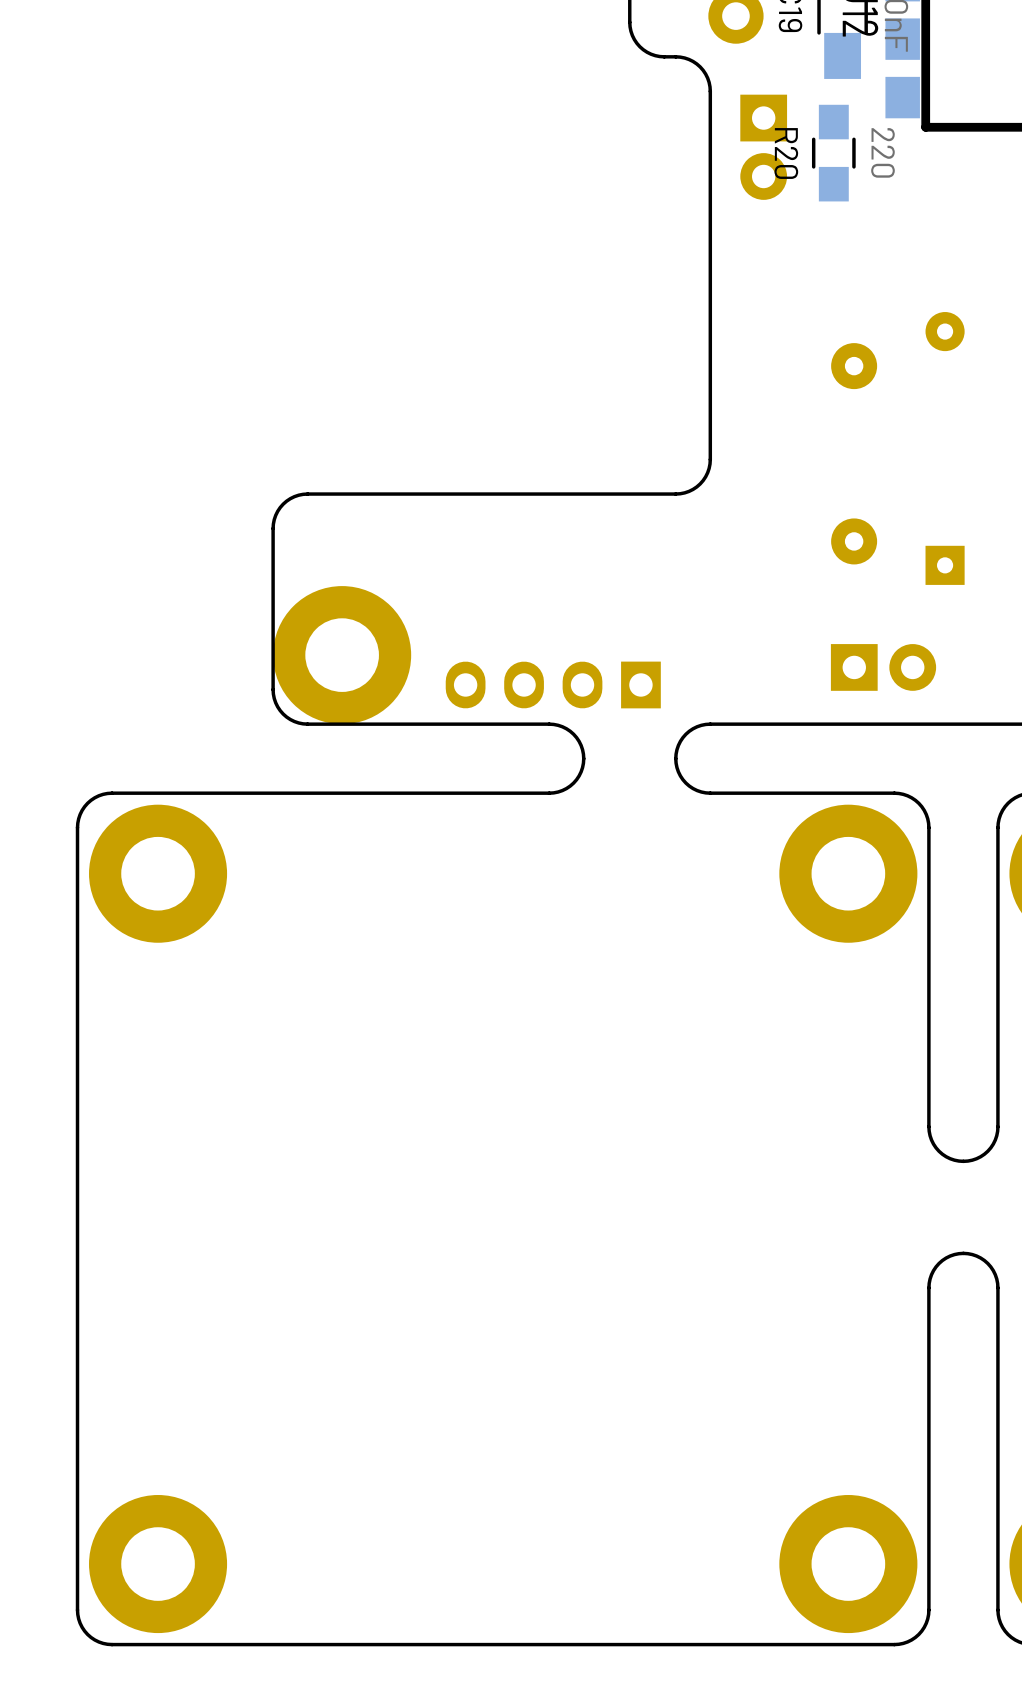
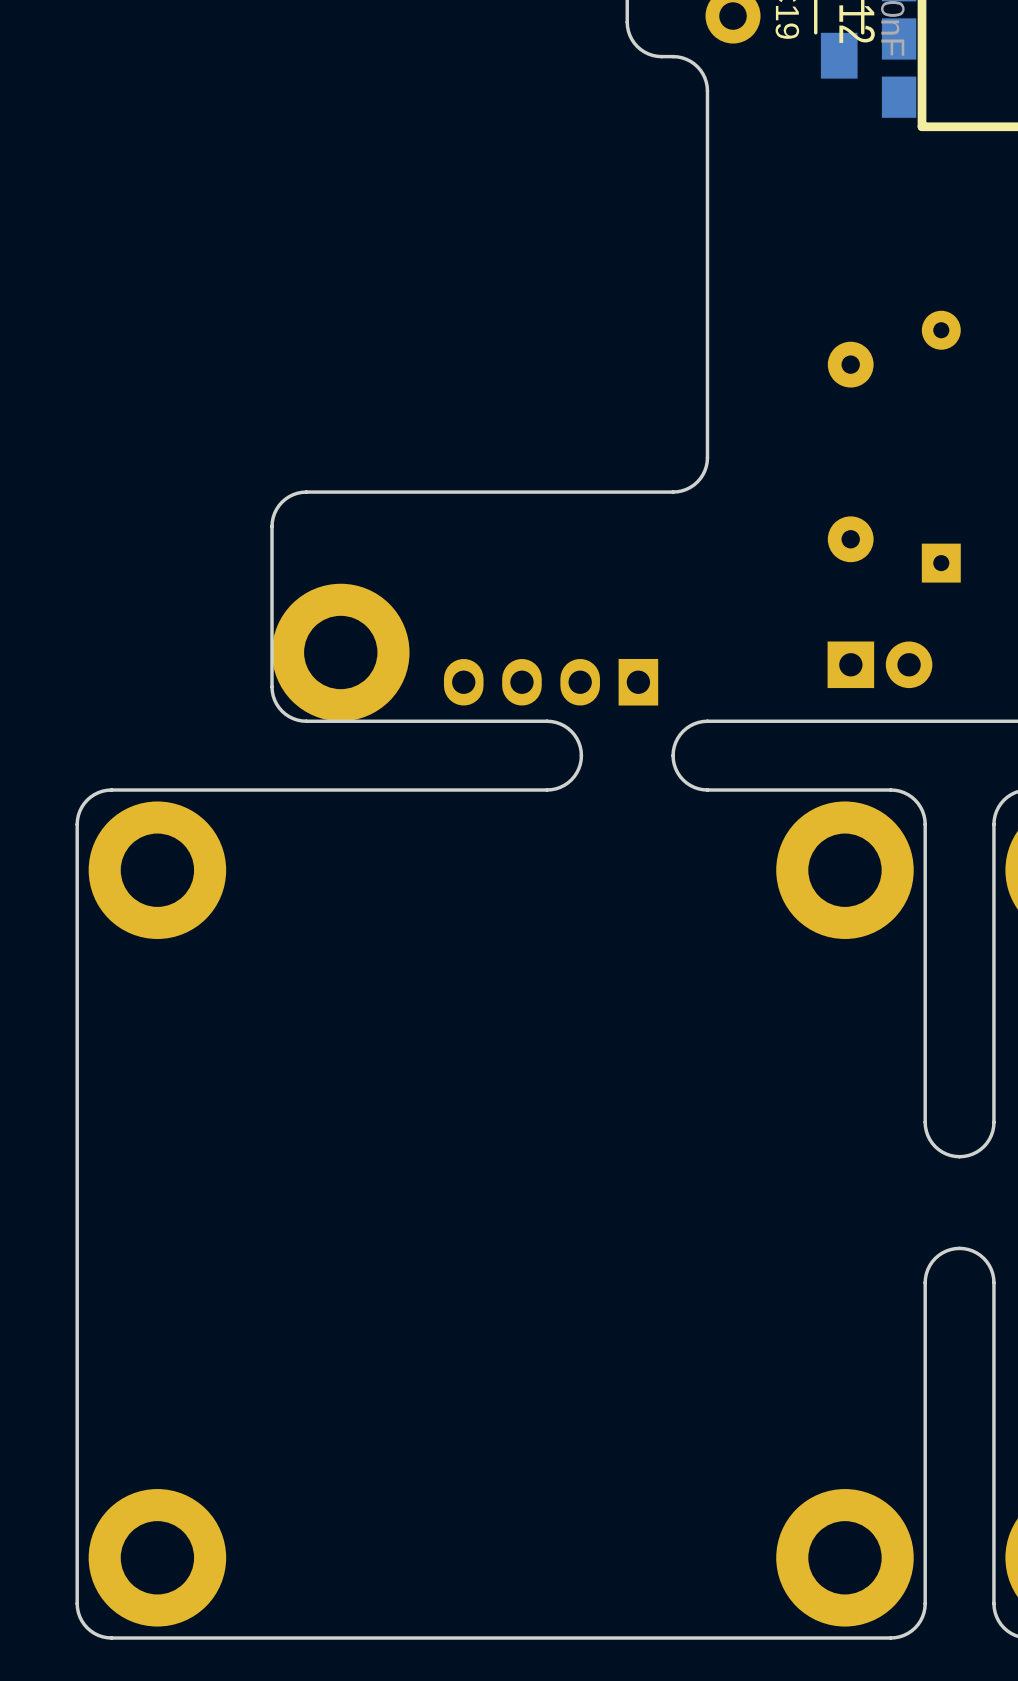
part: (763, 147) -> none
R20: 220 (833, 153) -> none

